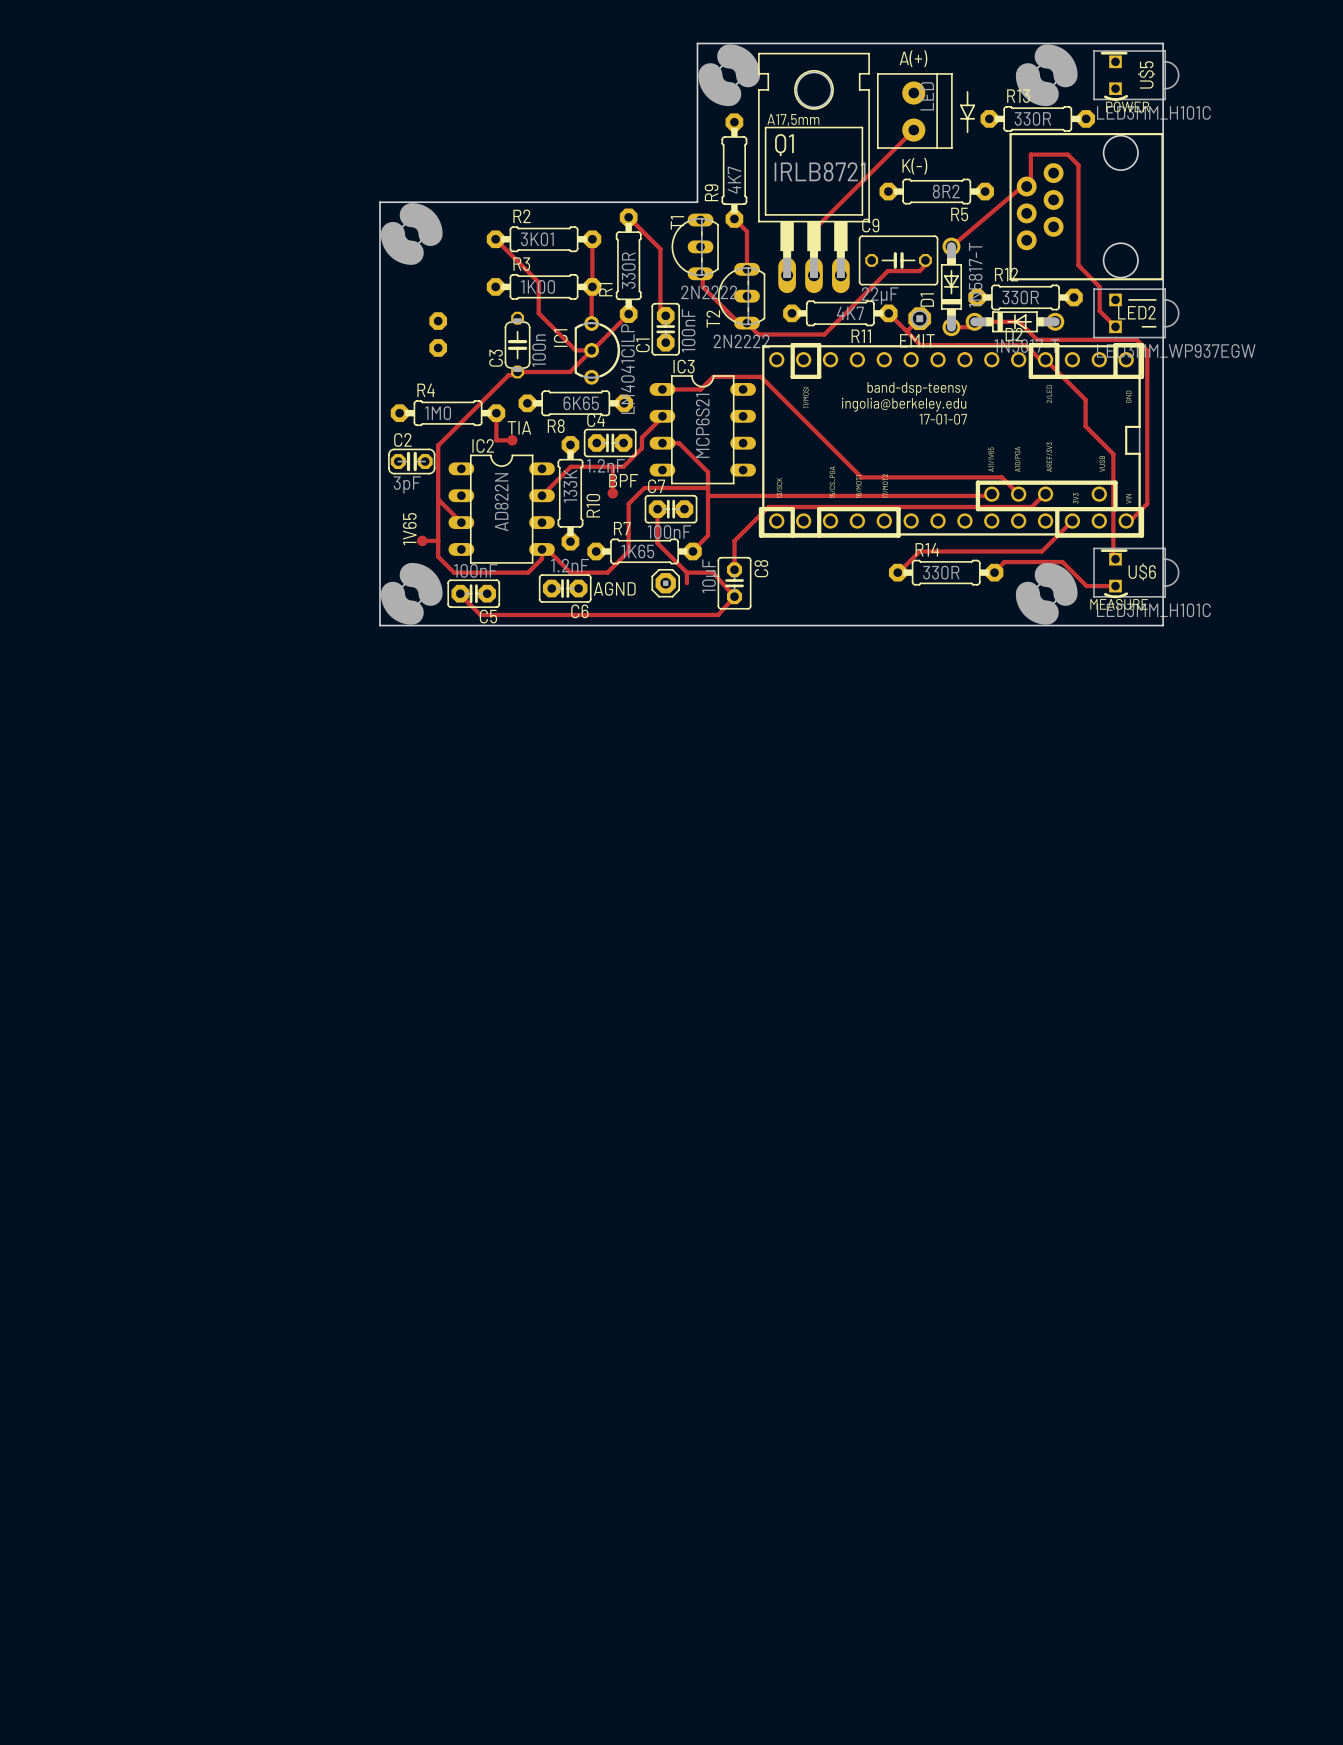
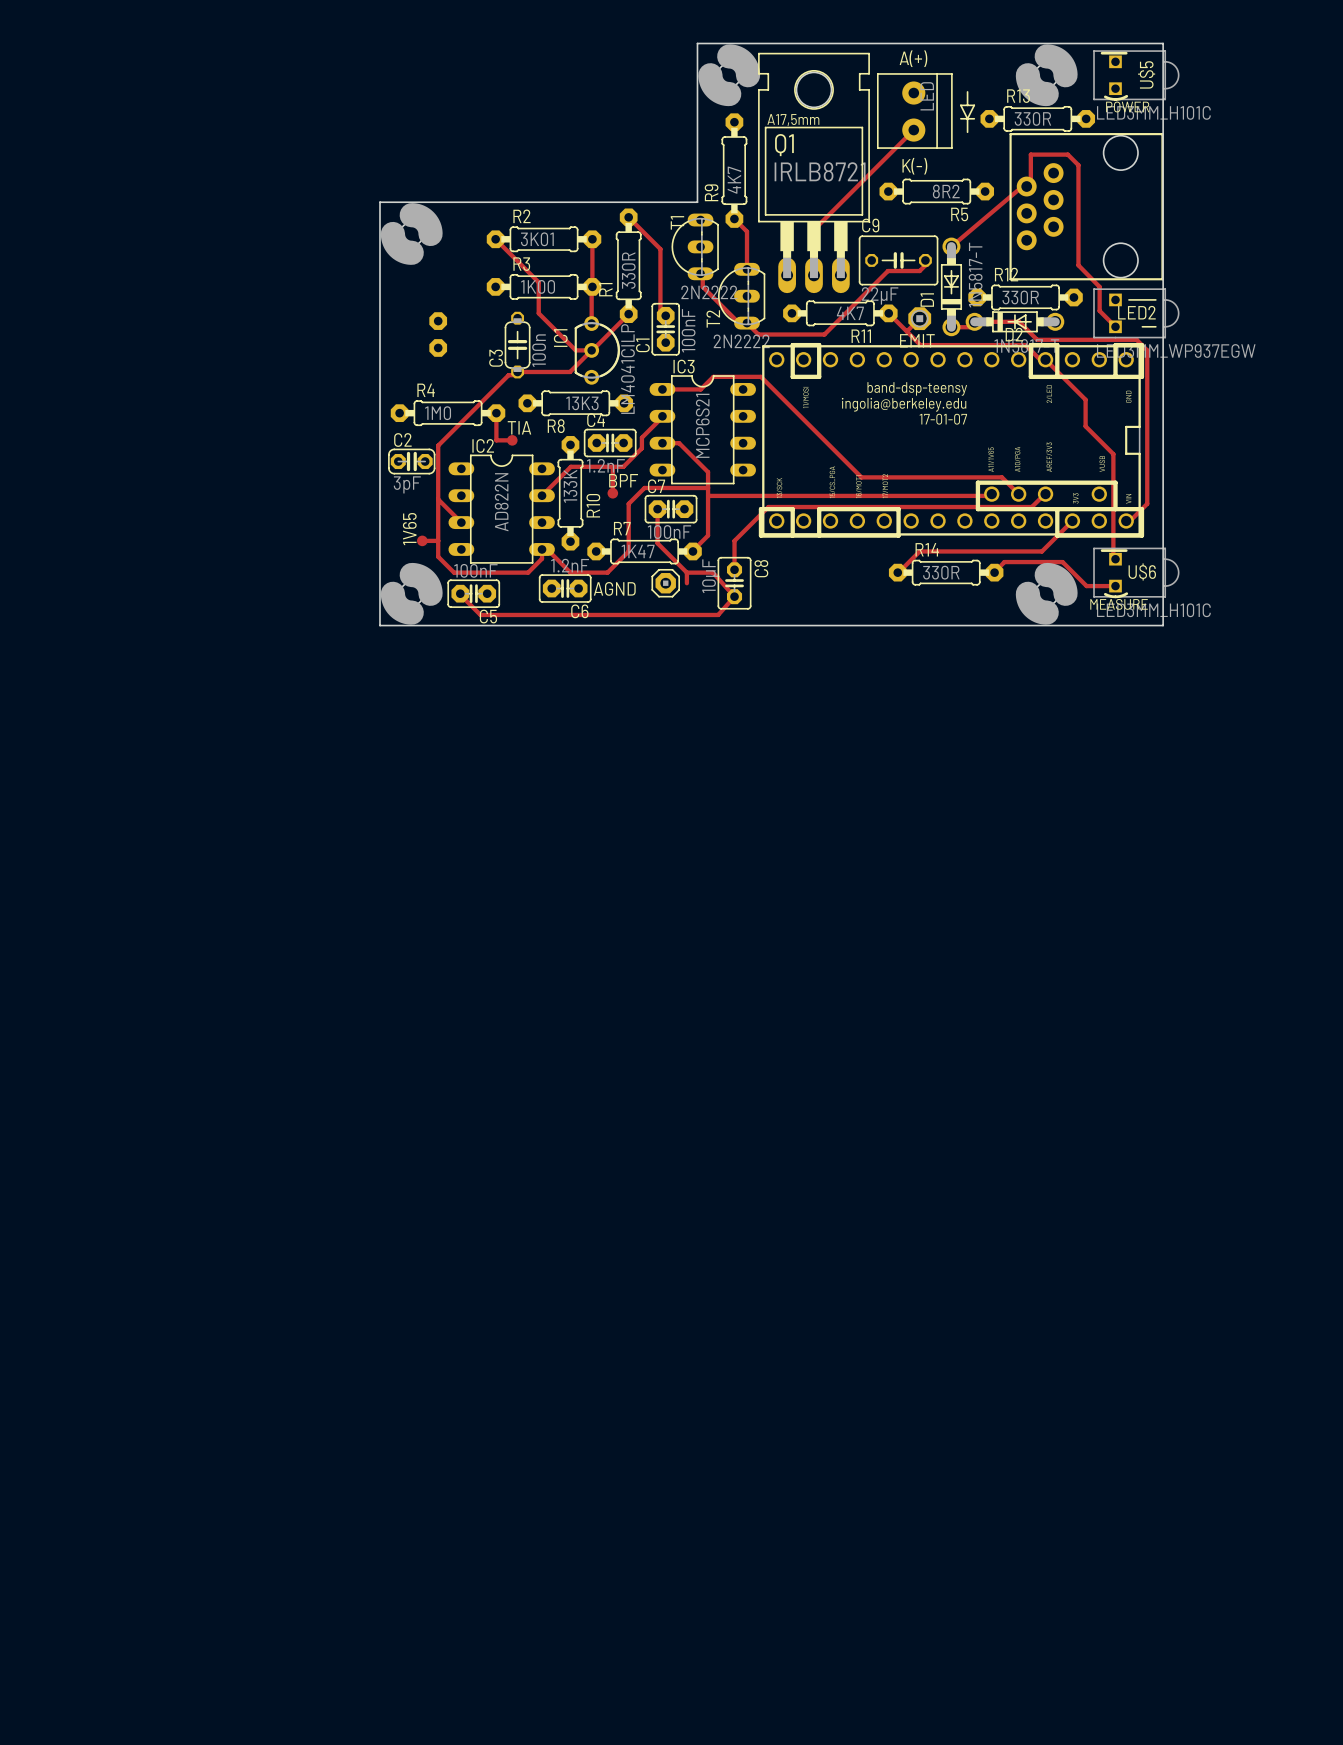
R8 value: 6K65 (581, 403) -> 13K3 (582, 403)
R7 value: 1K65 (637, 551) -> 1K47 (638, 551)

